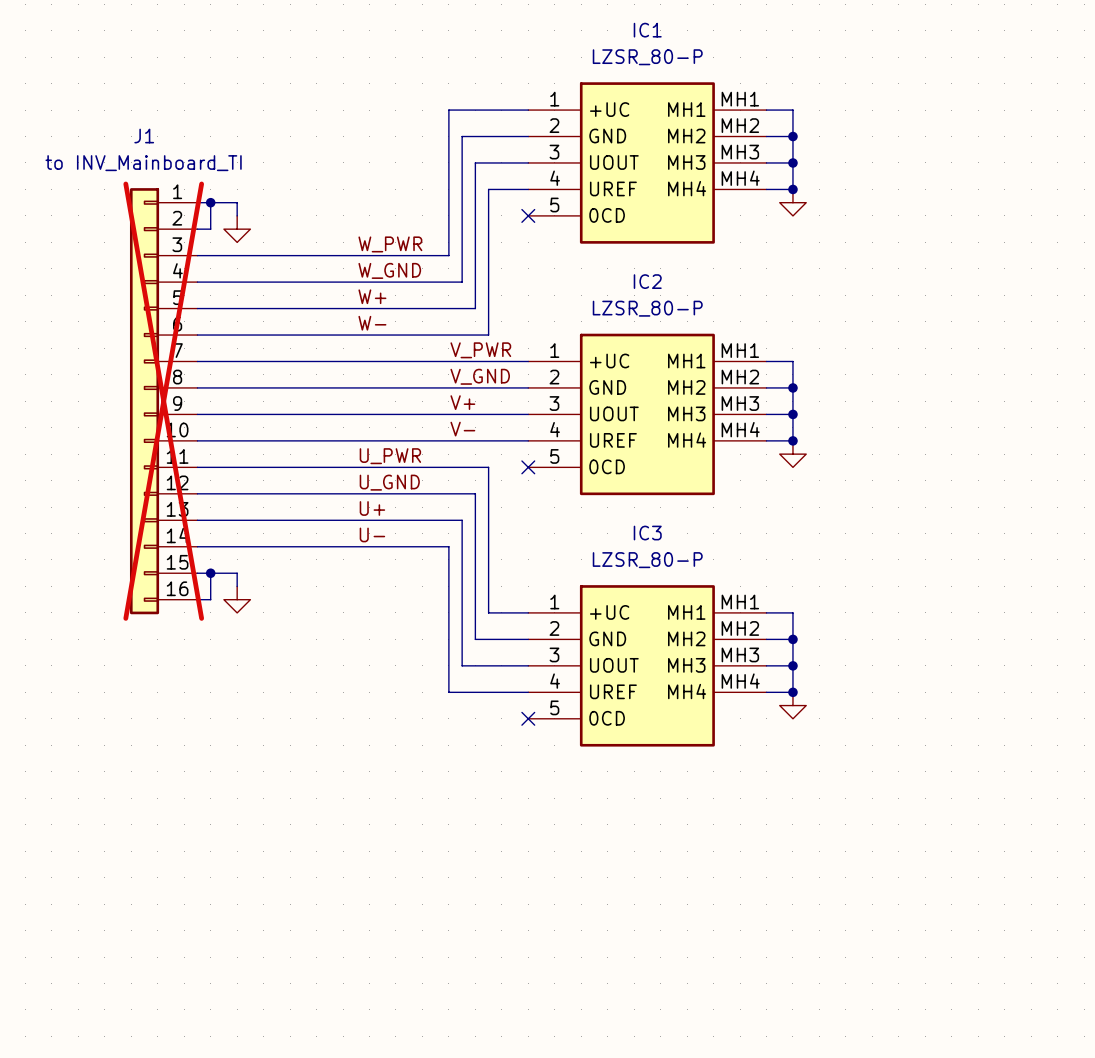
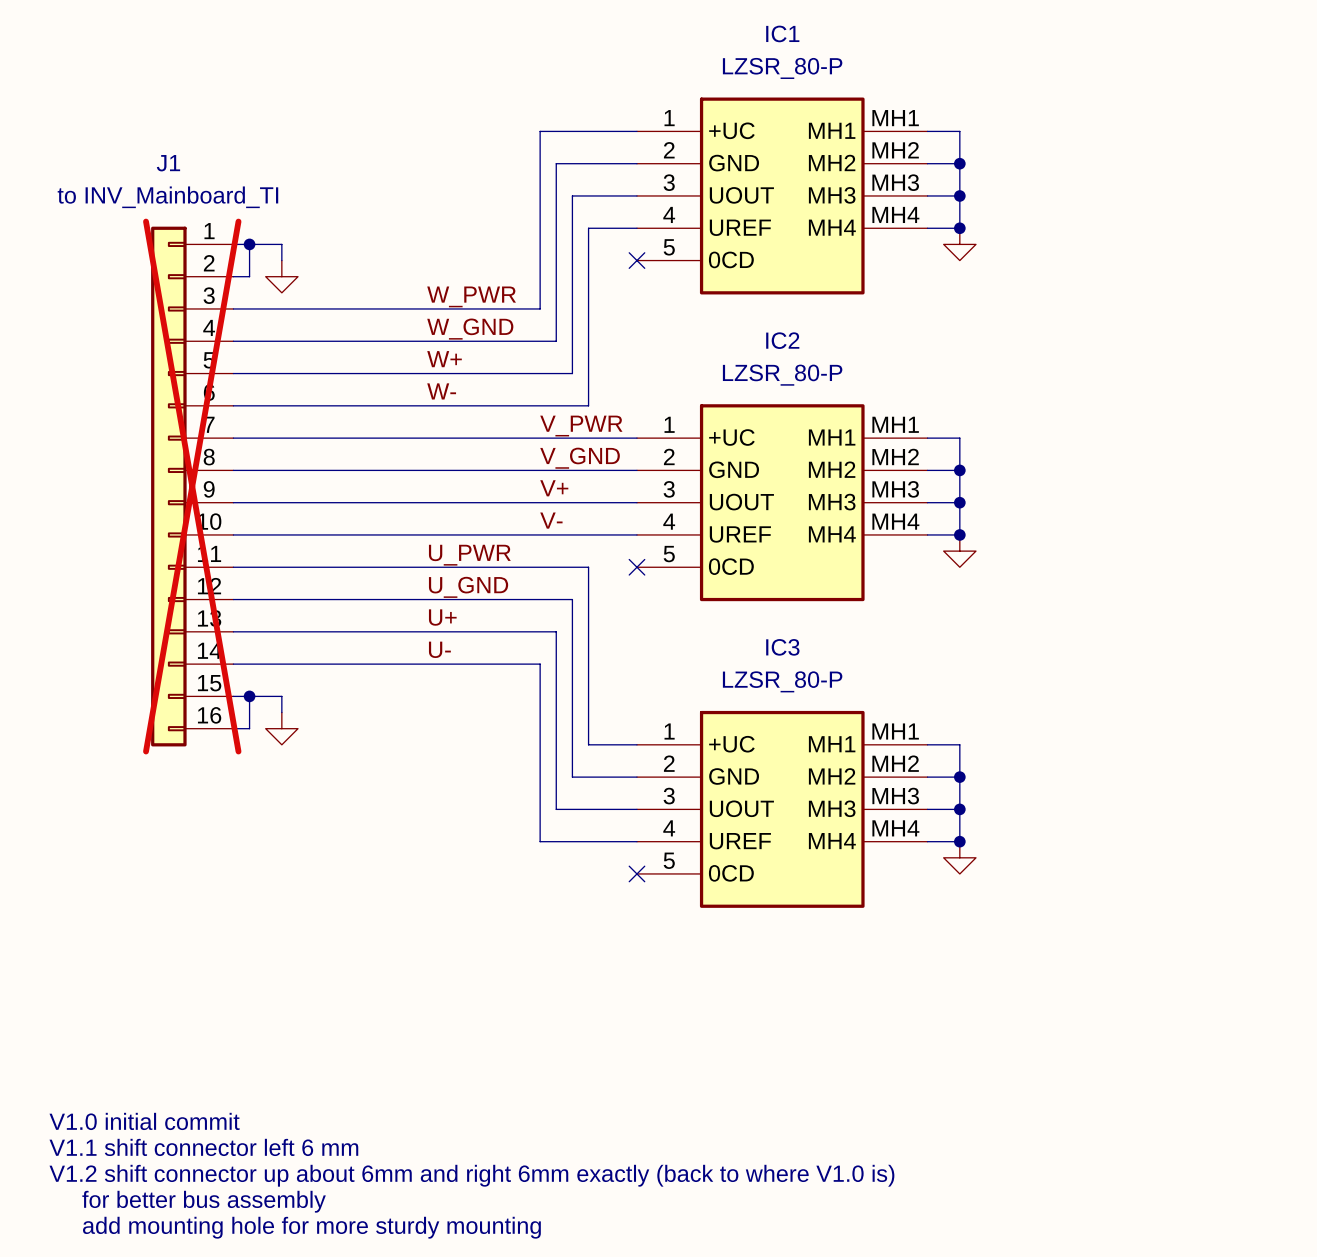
text: none -> V1.0 initial commit (144, 1121)
text: none -> V1.1 shift connector left 6 mm (203, 1147)
text: none -> V1.2 shift connector up about 6mm and right 6mm exactly (back to where V1.0 is) (471, 1175)
text: none -> for better bus assembly (204, 1201)
text: none -> add mounting hole for more sturdy mounting (311, 1227)

